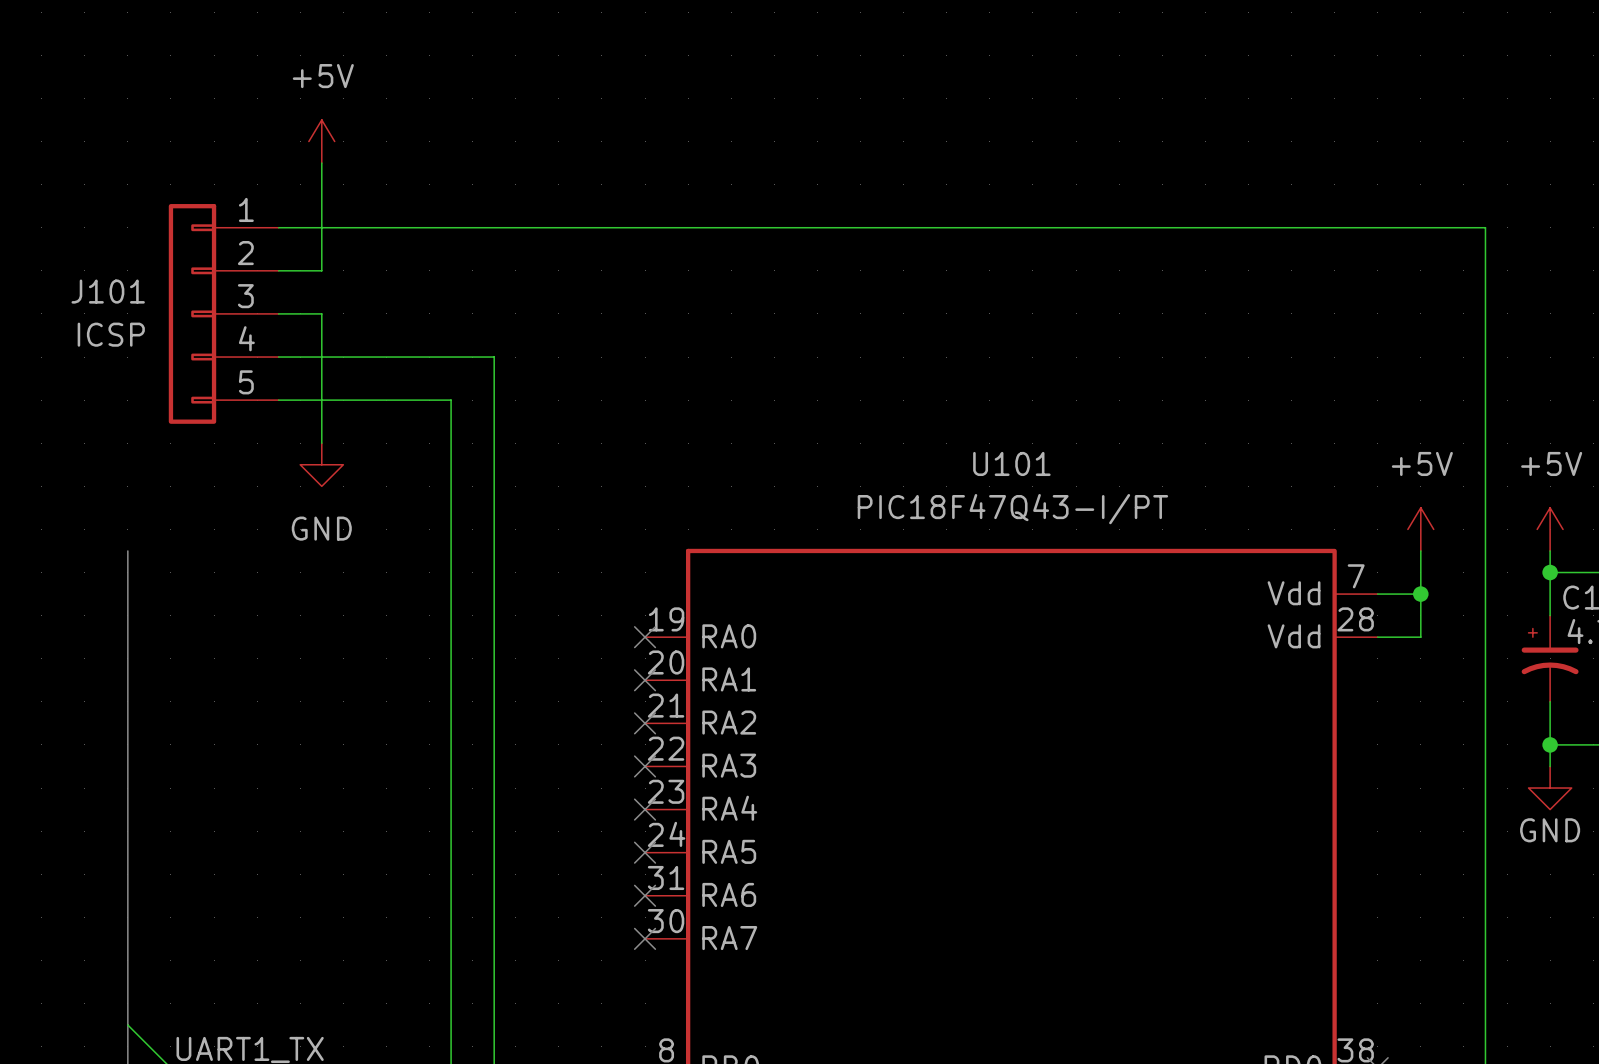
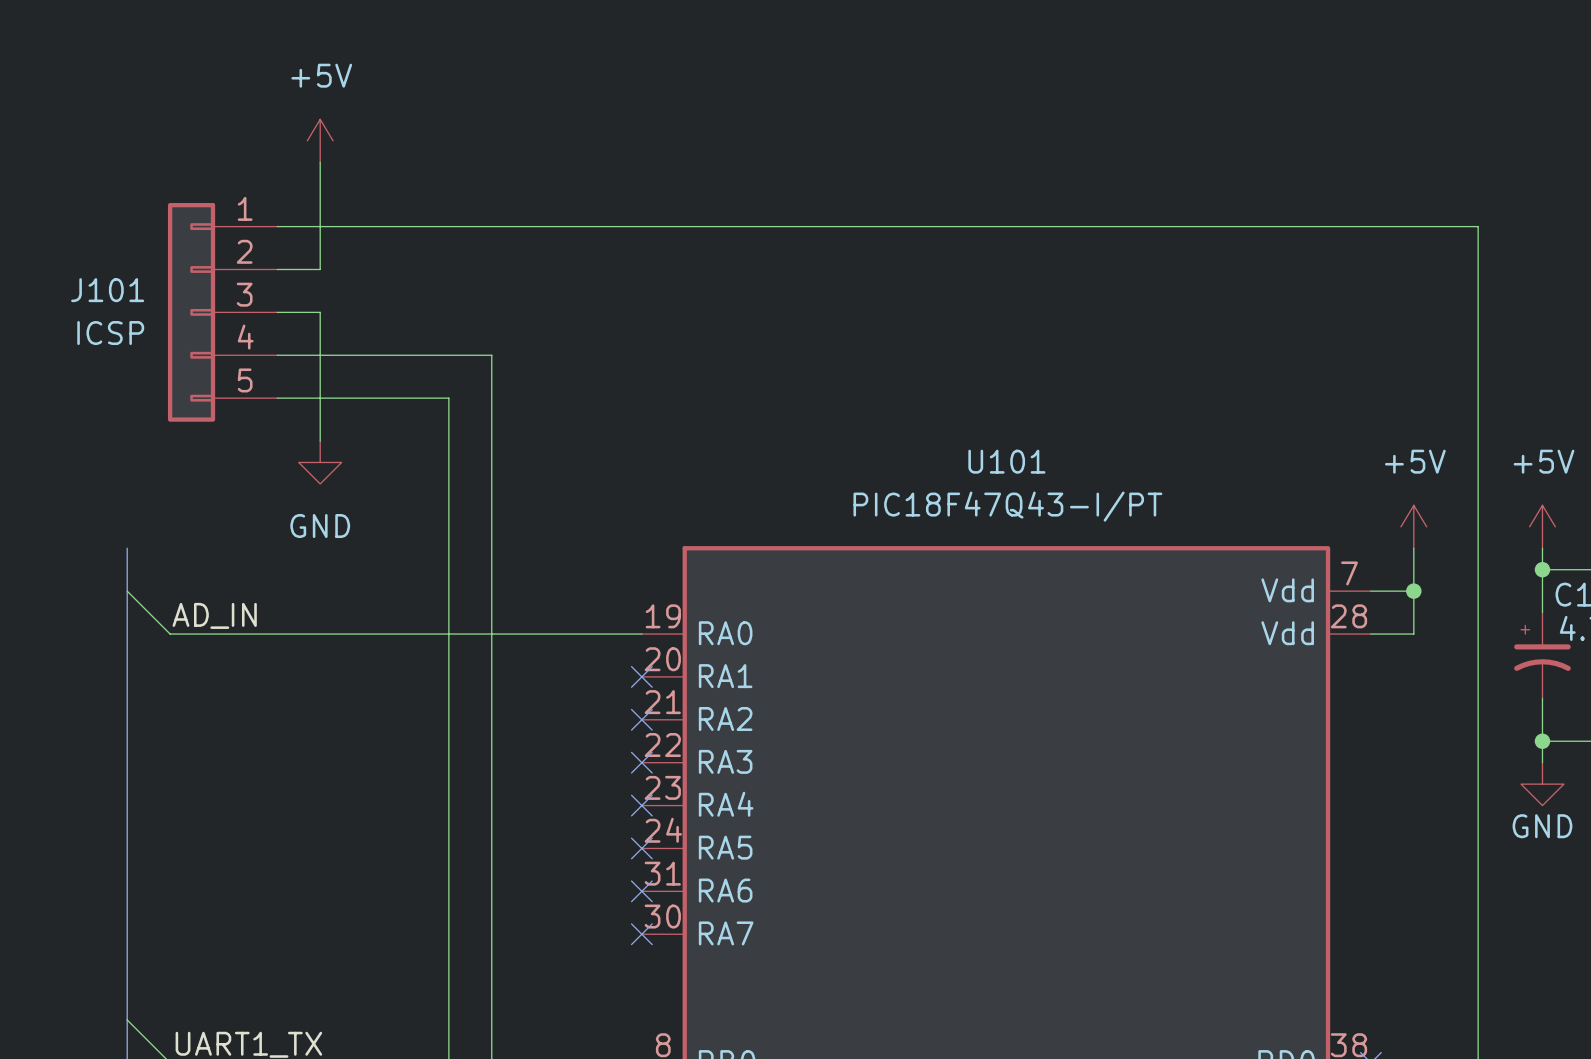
wire: none -> (127, 591) (170, 634) (641, 634)
label: none -> AD_IN (214, 615)
no-connect mark: (645, 637) -> none

